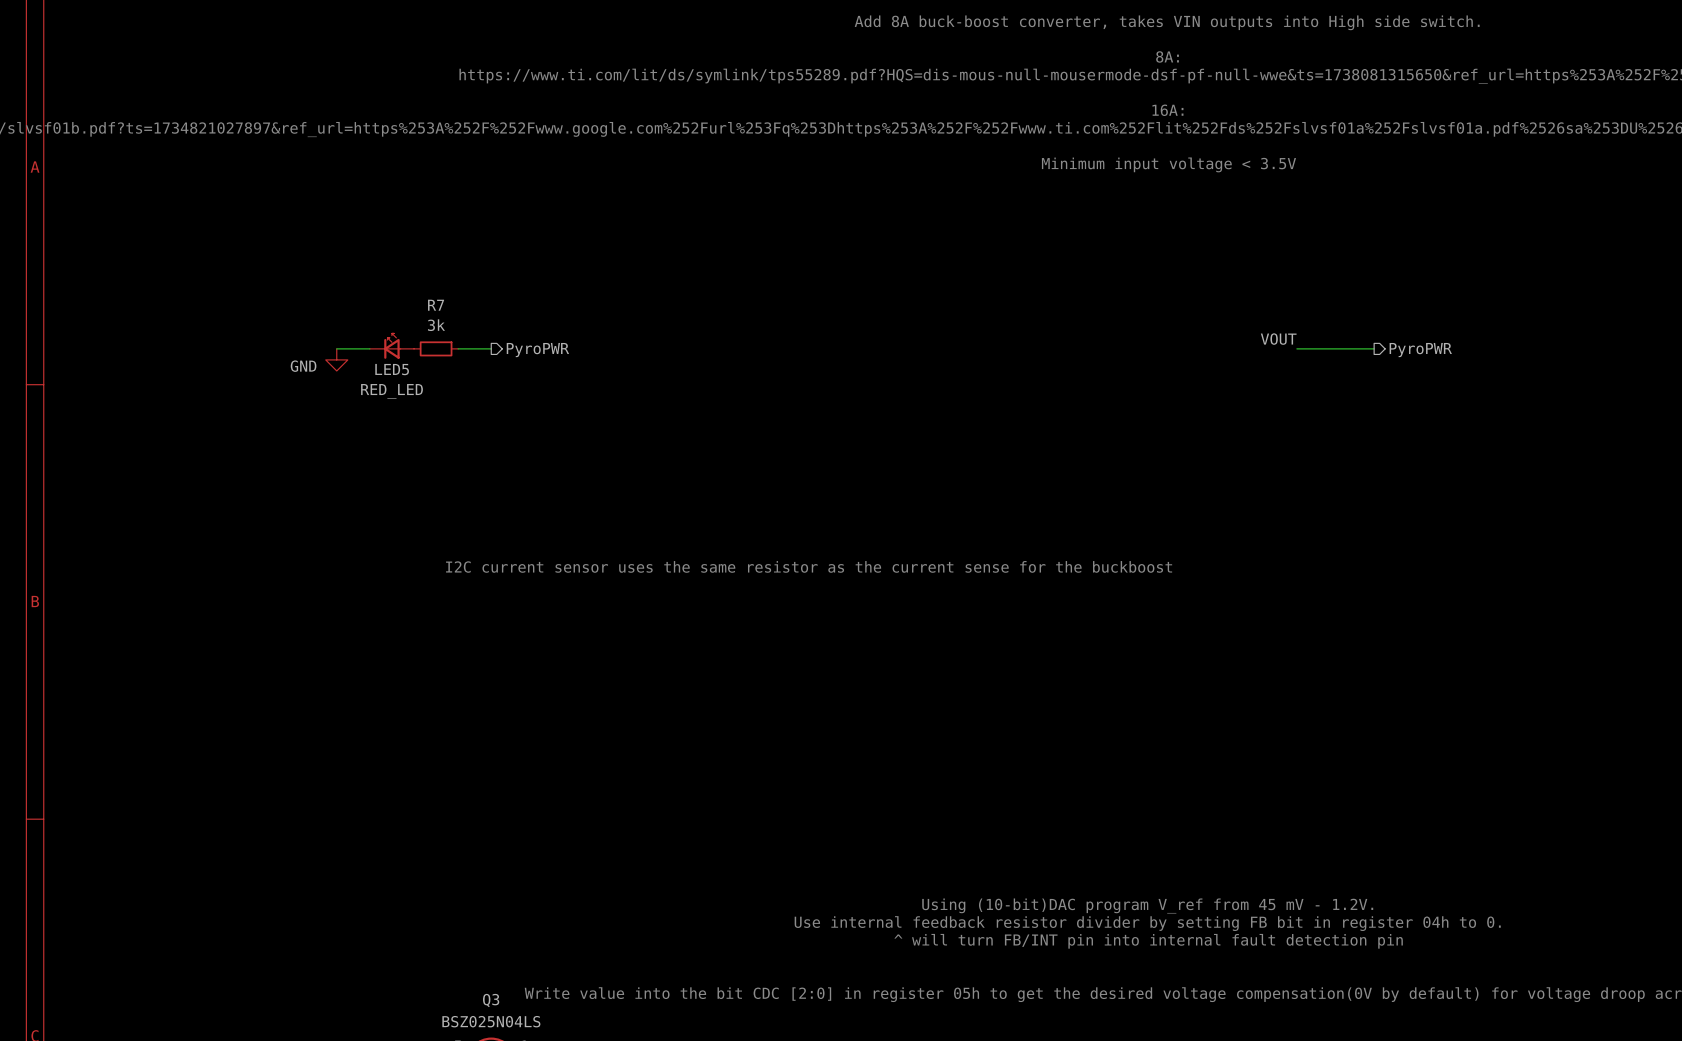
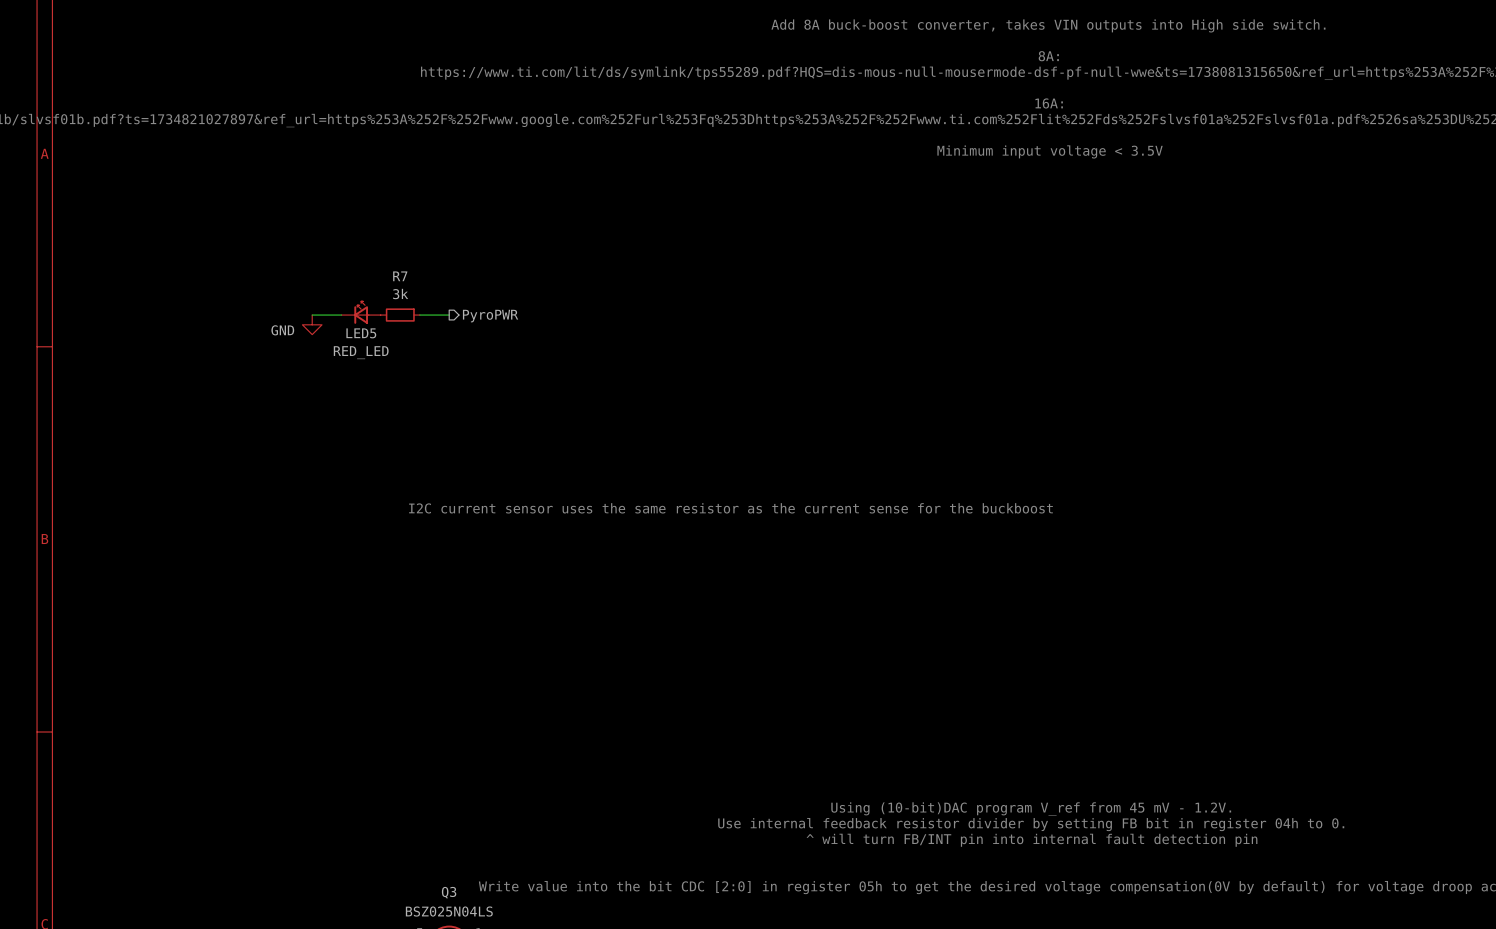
label: VOUT (1278, 339) -> none
wire: (1296, 348) (1374, 348) -> none
hierarchical label: PyroPWR (1420, 350) -> none

